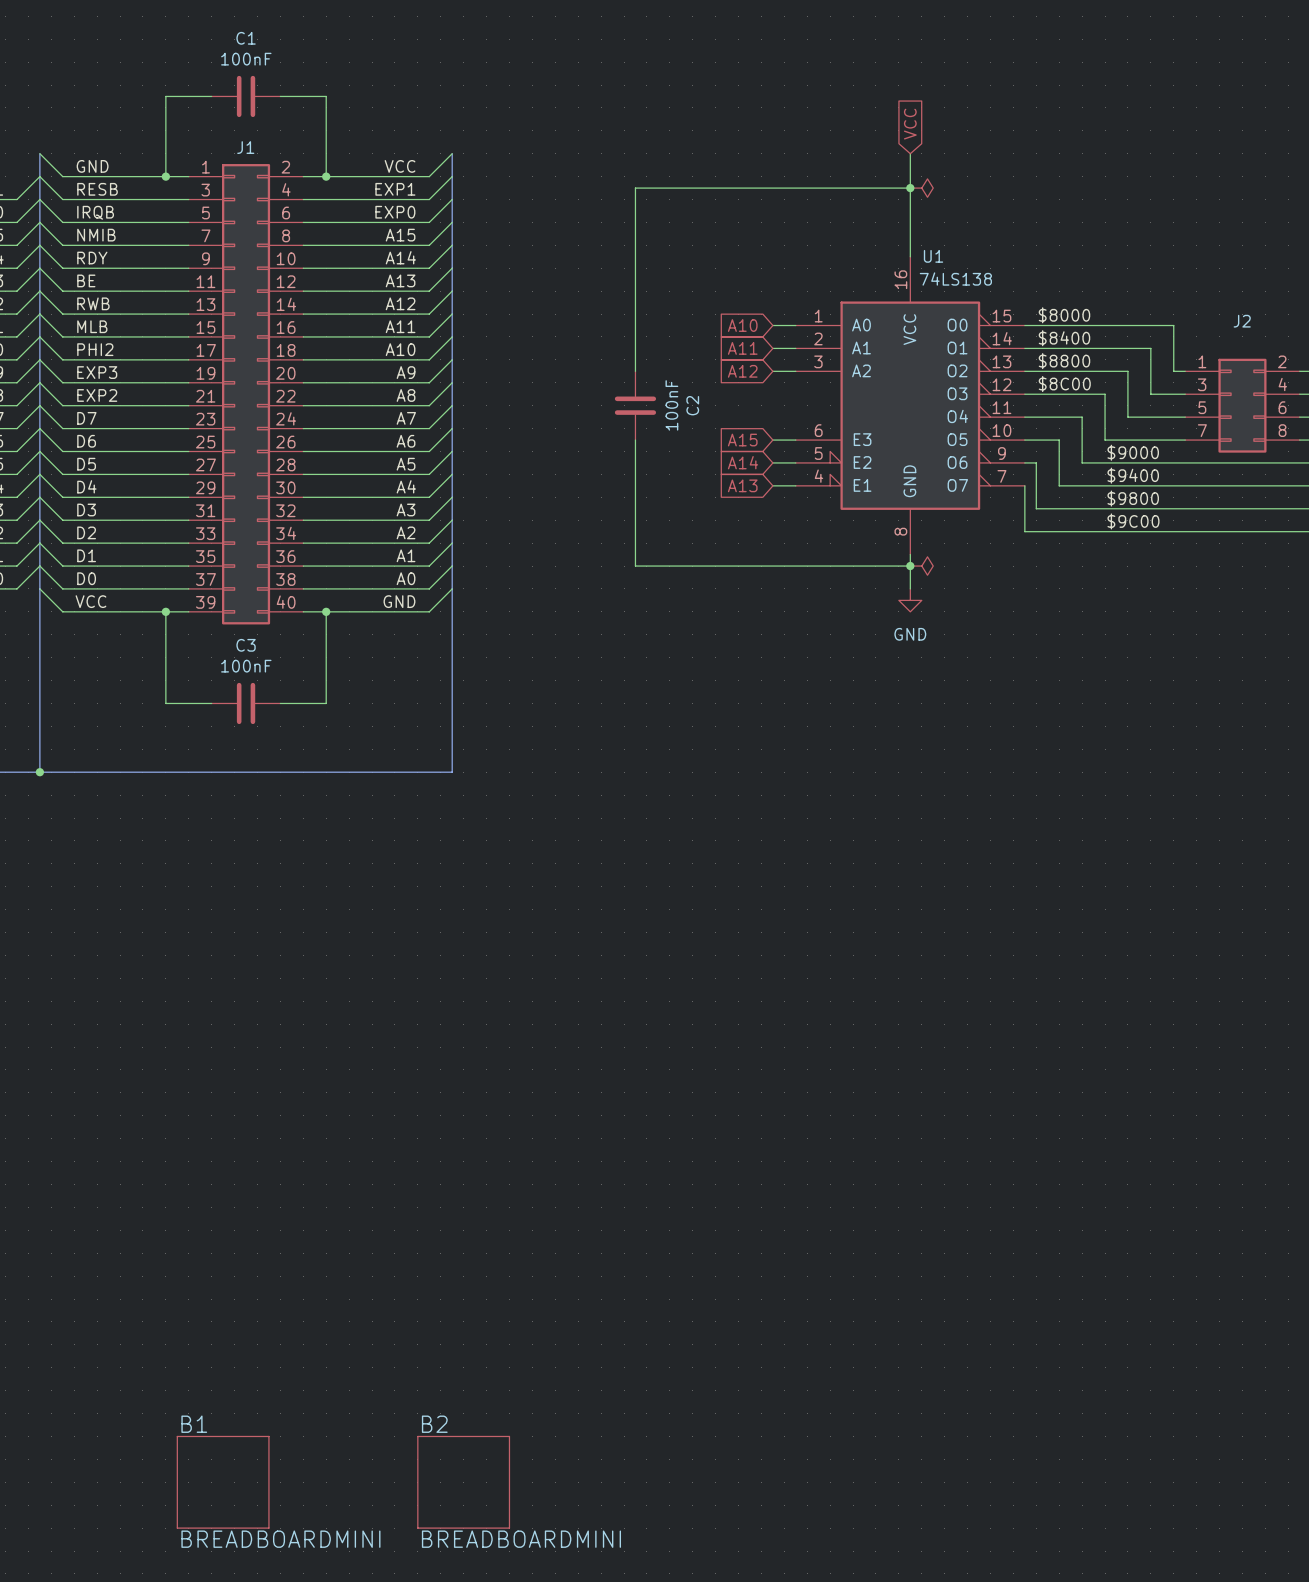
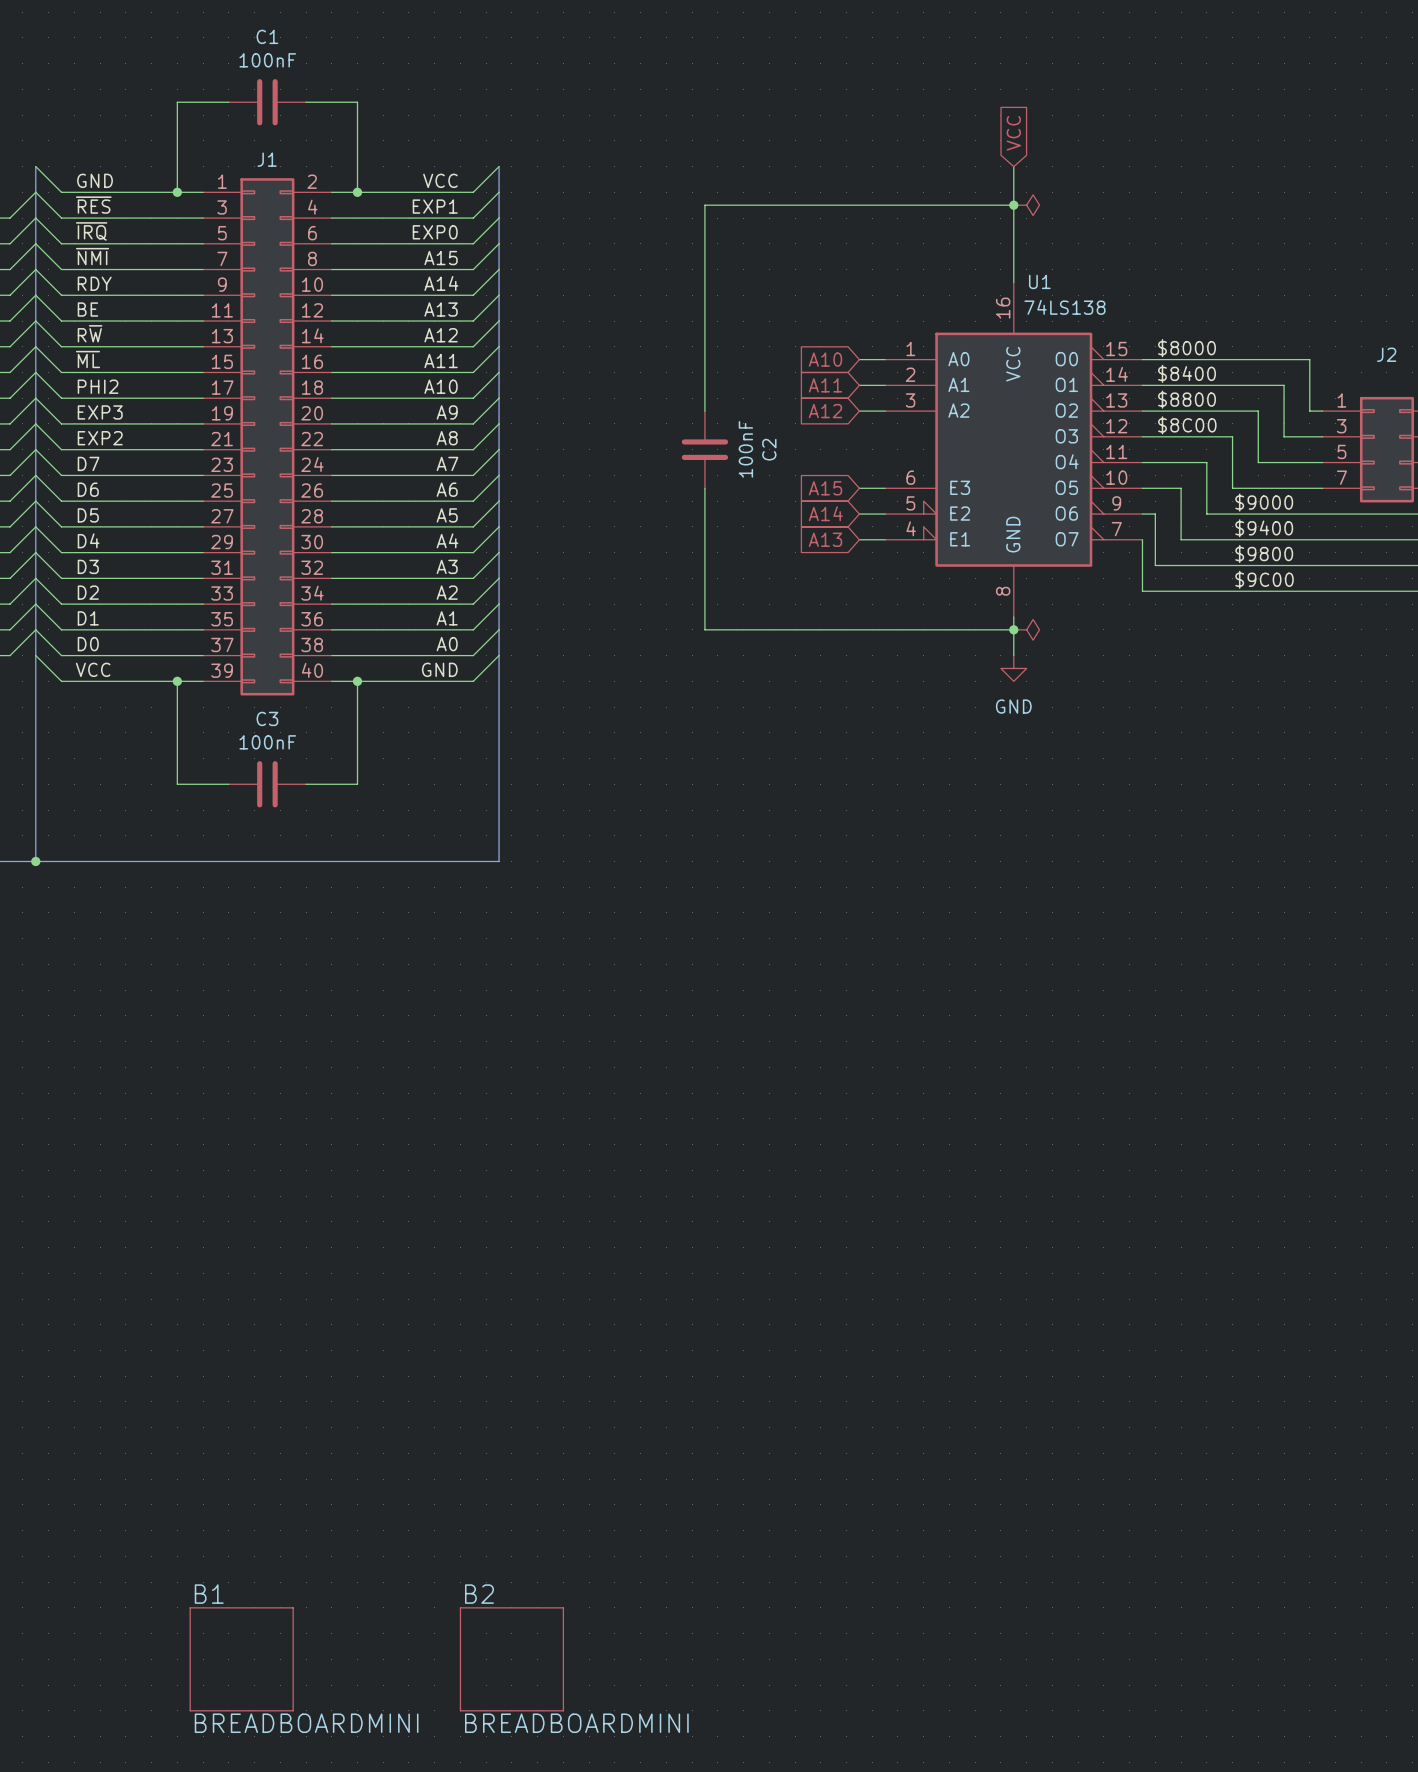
label: RESB (97, 189) -> ~{RES} (93, 205)
label: IRQB (95, 212) -> ~{IRQ} (91, 231)
label: NMIB (96, 235) -> ~{NMI} (92, 256)
label: RWB (93, 303) -> R~{W} (90, 333)
label: MLB (92, 326) -> ~{ML} (88, 359)

